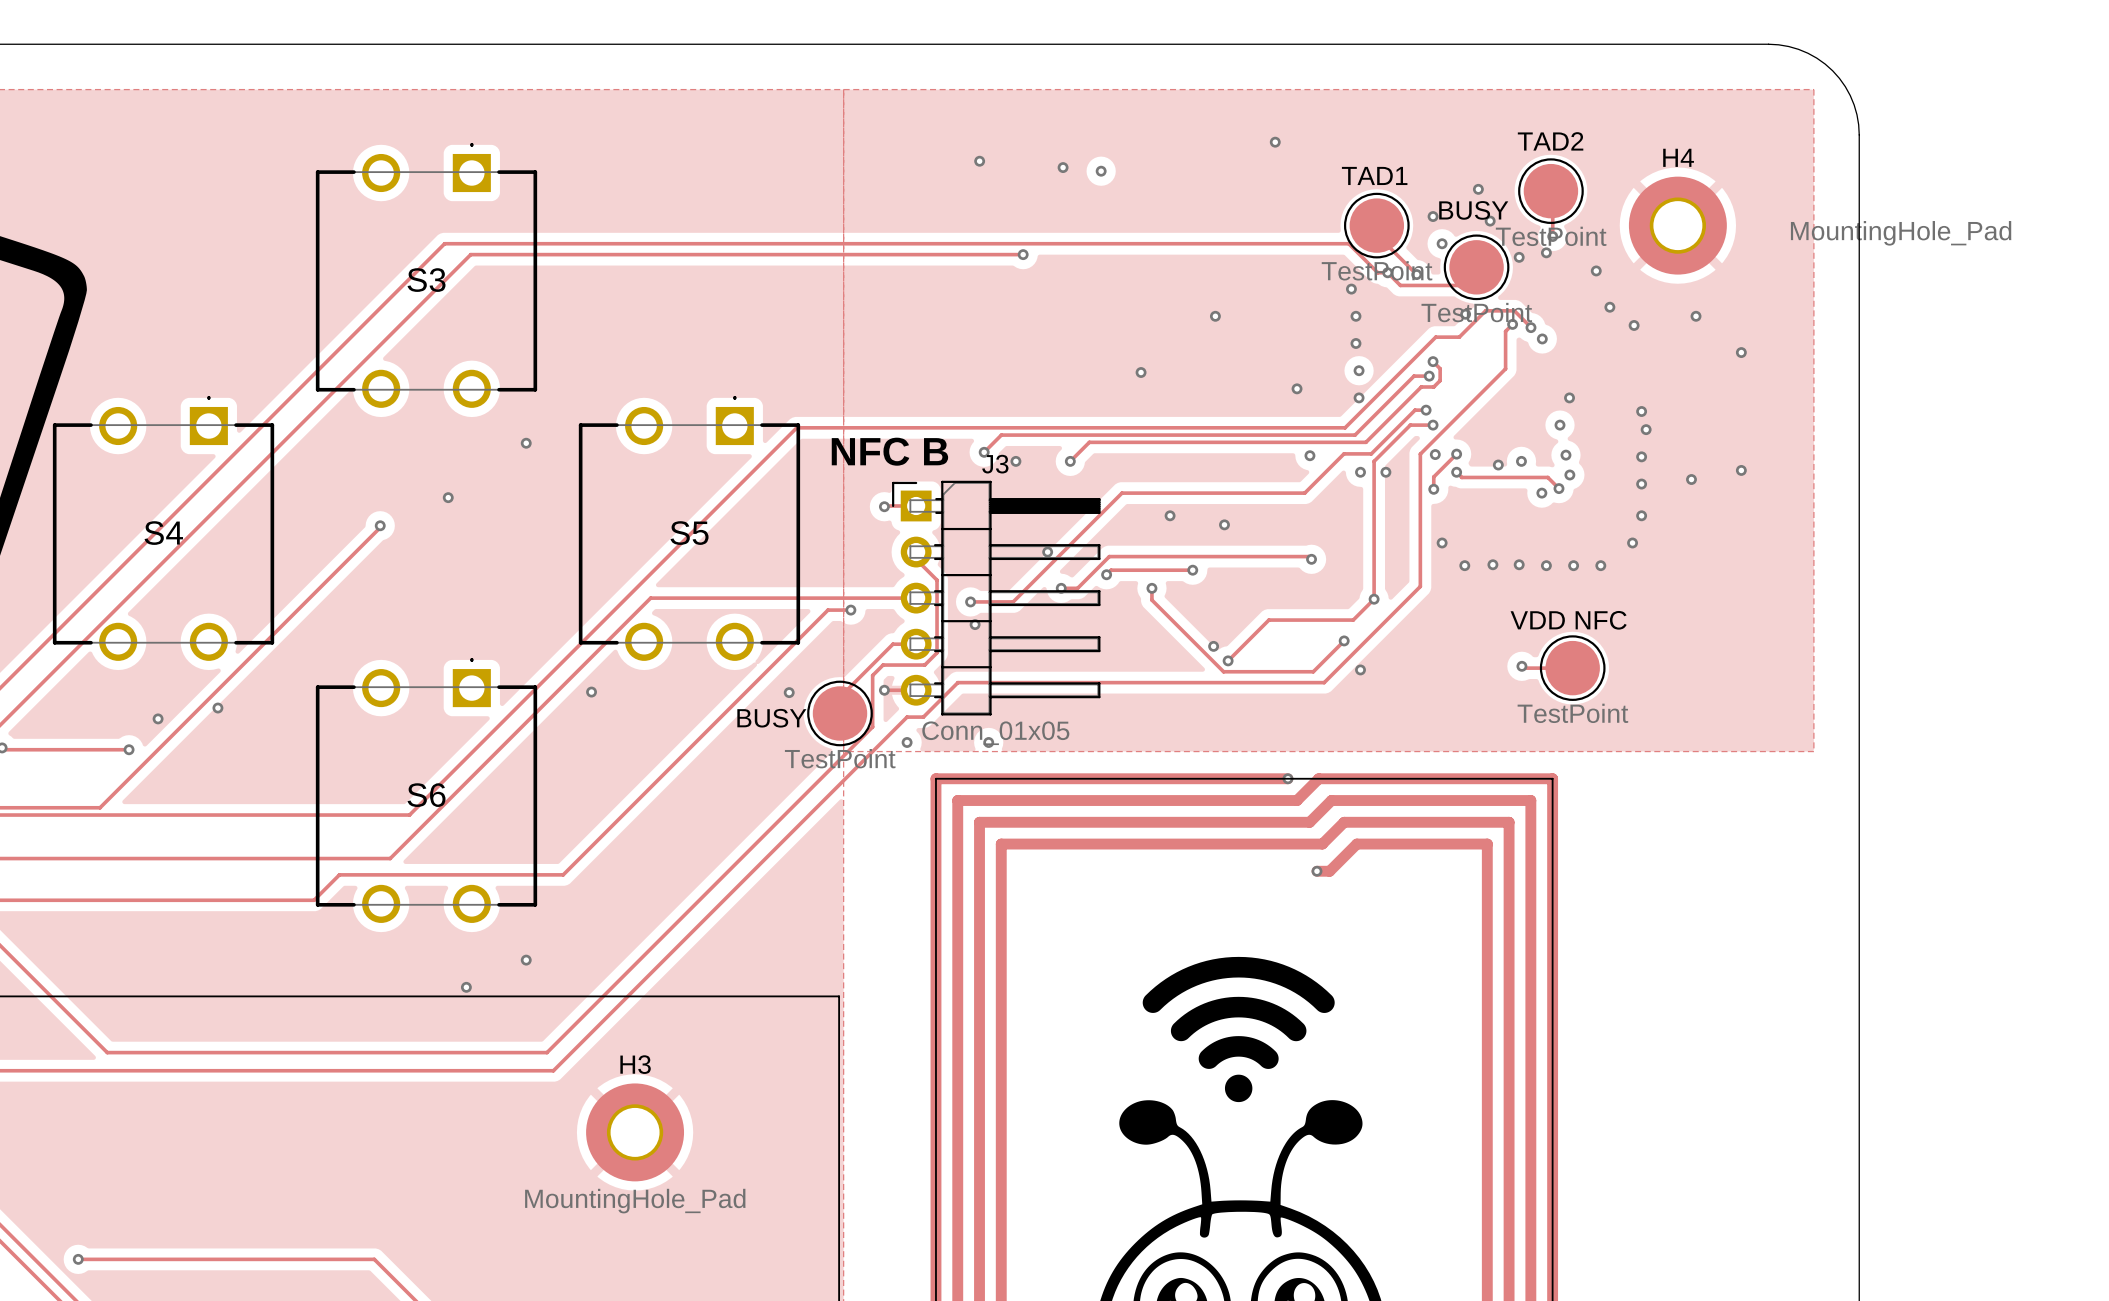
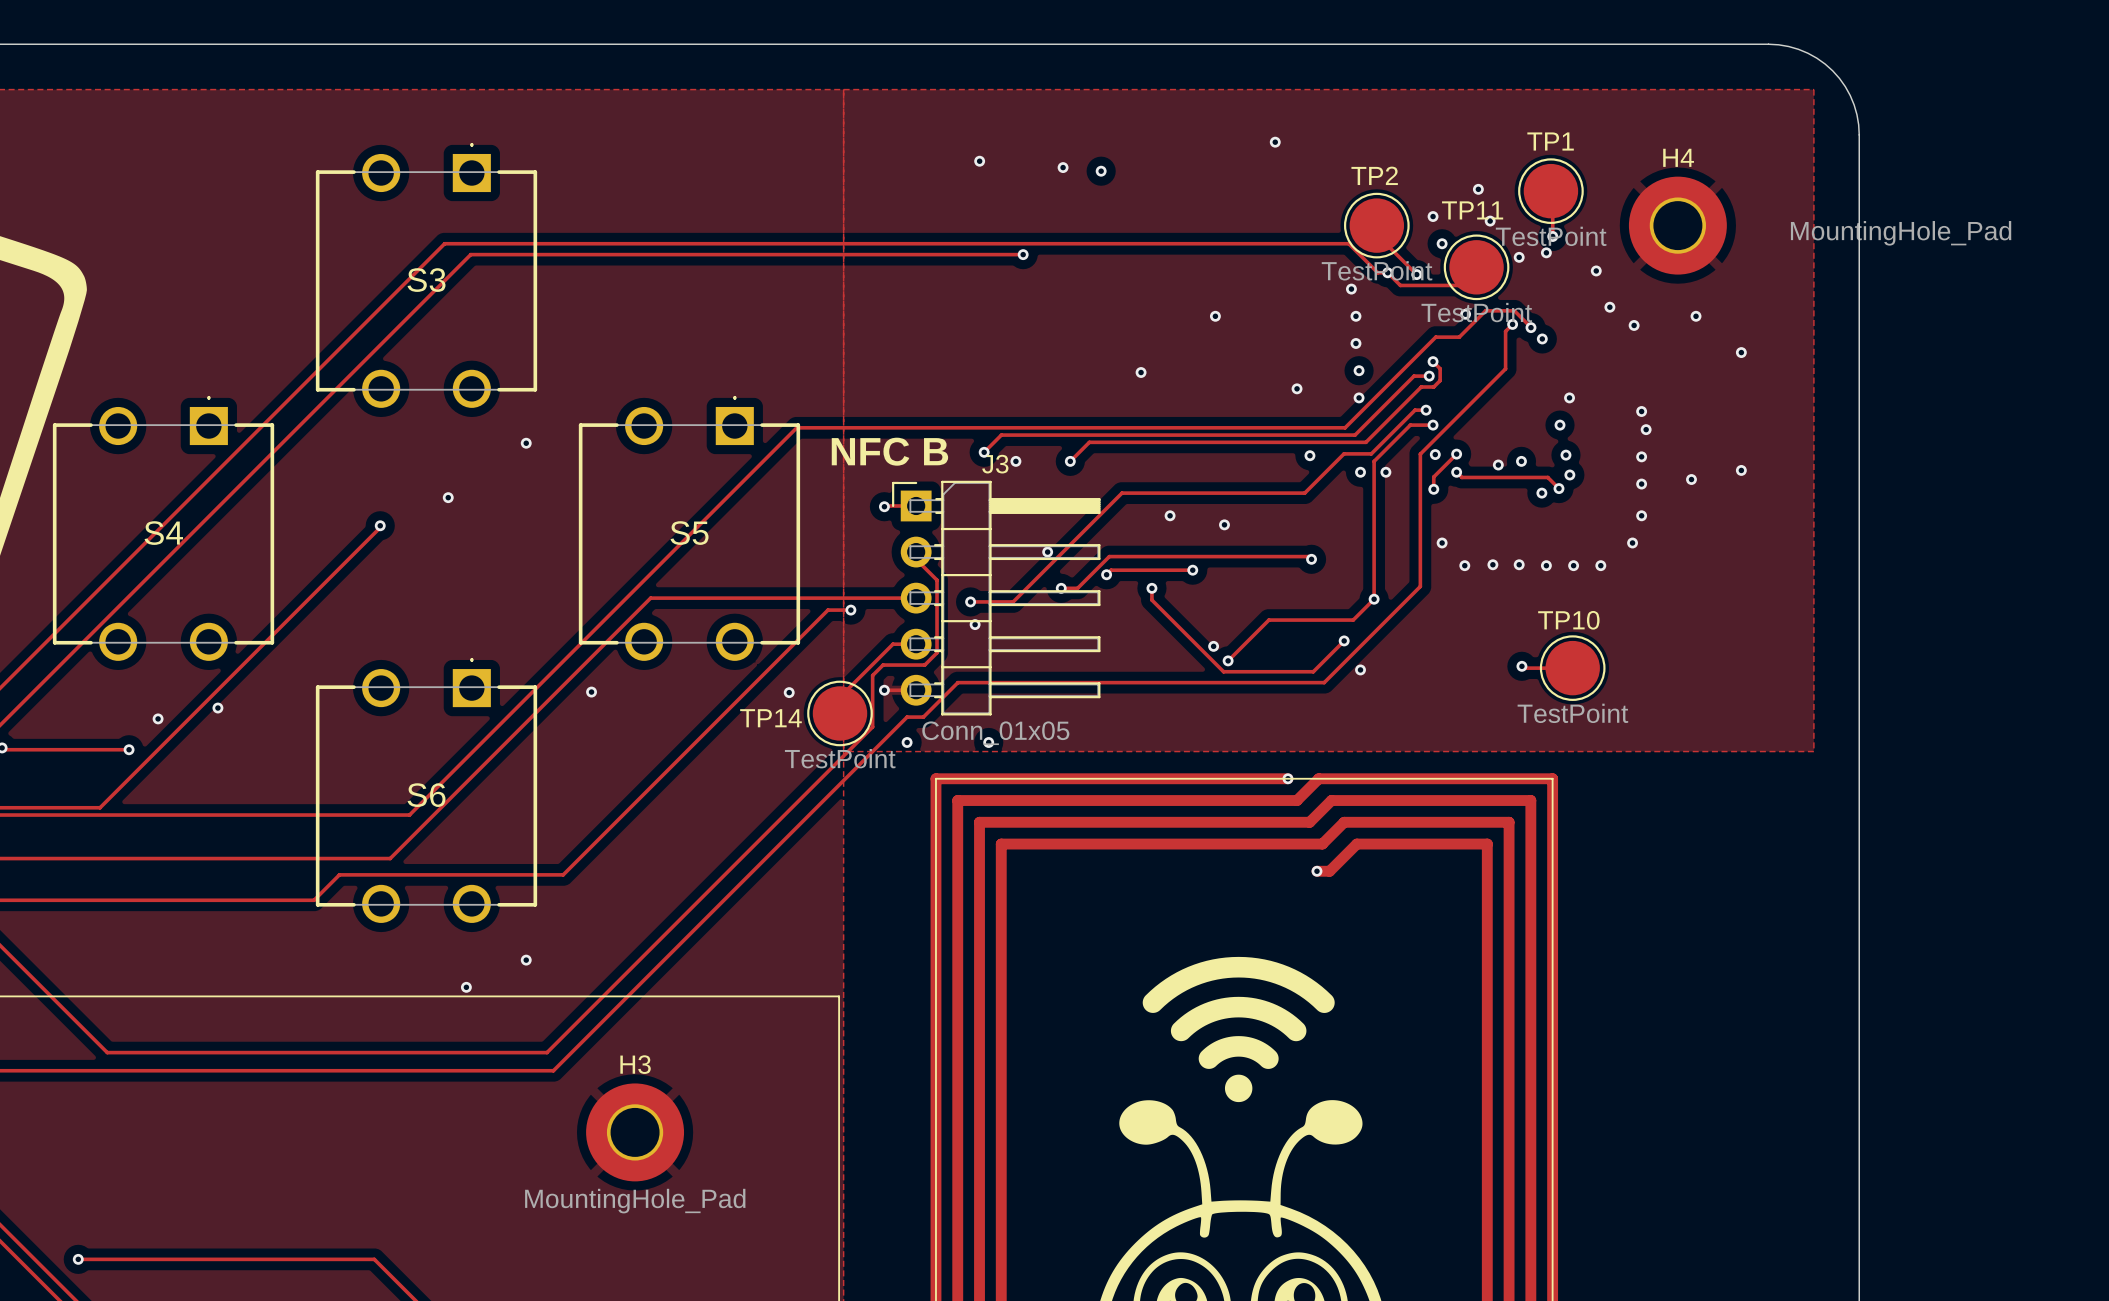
TAD2 name: TAD2 (1550, 141) -> TP1 (1550, 141)
TAD1 name: TAD1 (1374, 175) -> TP2 (1374, 175)
BUSY name: BUSY (1473, 210) -> TP11 (1472, 210)
VDD NFC name: VDD NFC (1568, 620) -> TP10 (1568, 620)
BUSY name: BUSY (771, 718) -> TP14 (770, 718)

